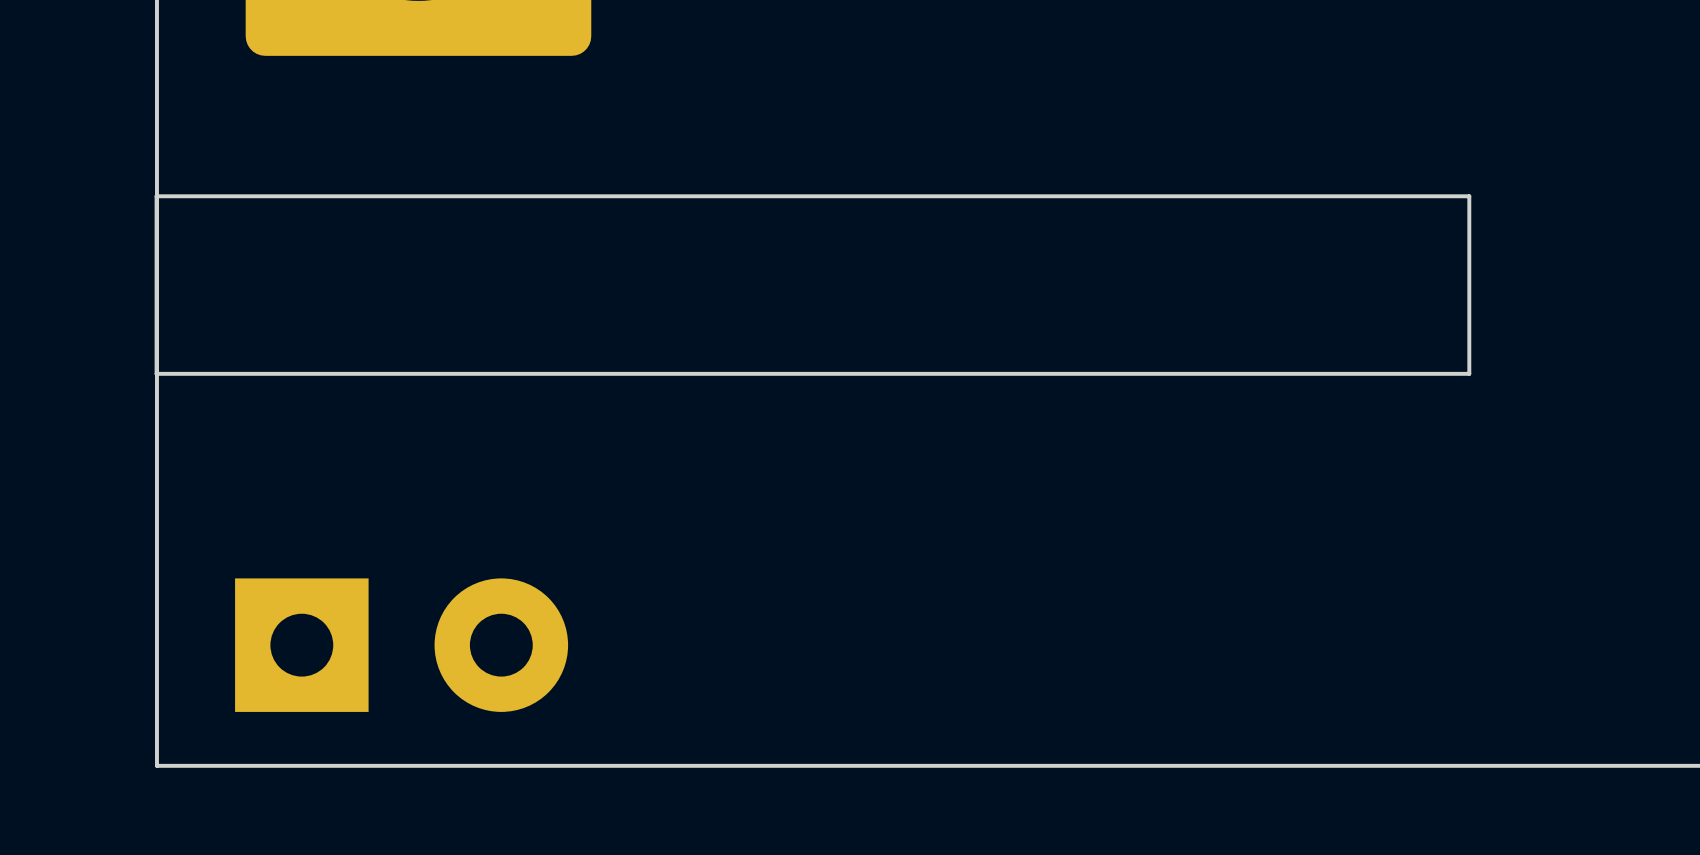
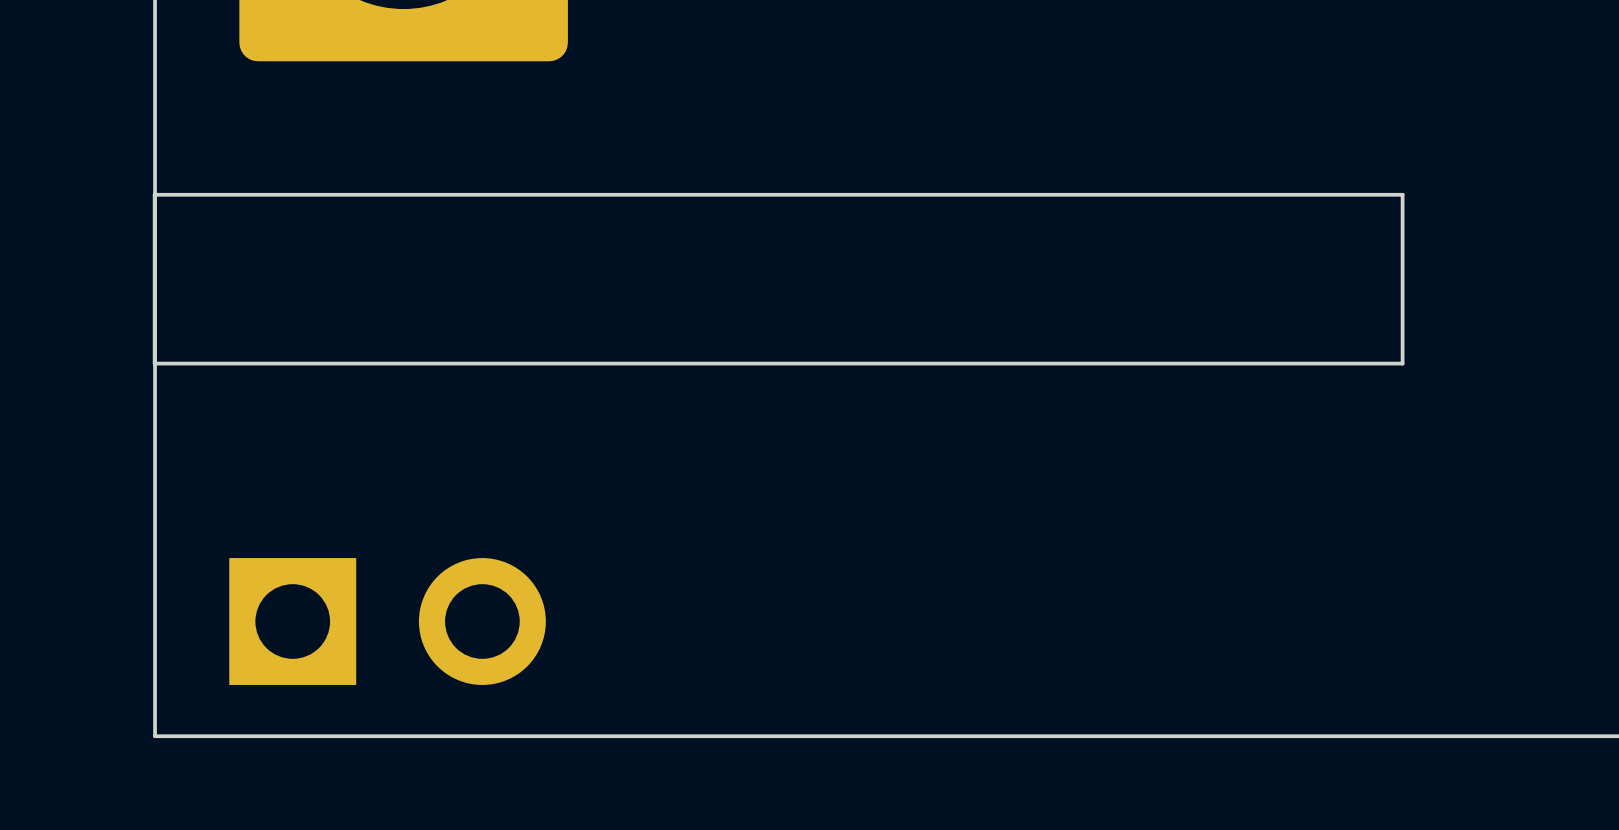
part footprint: [235, 578, 569, 712] -> [229, 558, 546, 685]

